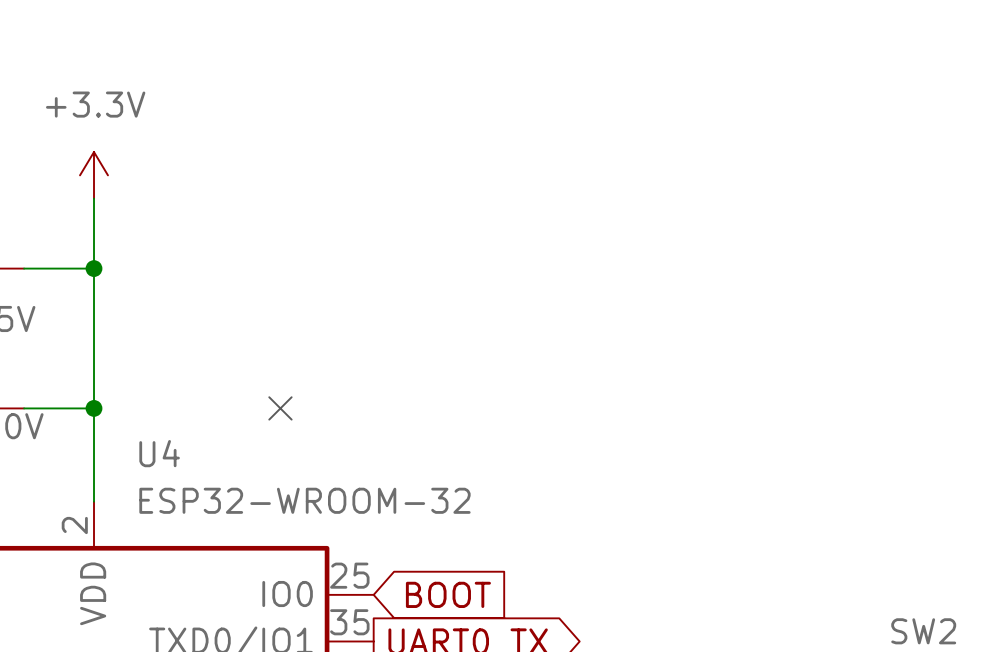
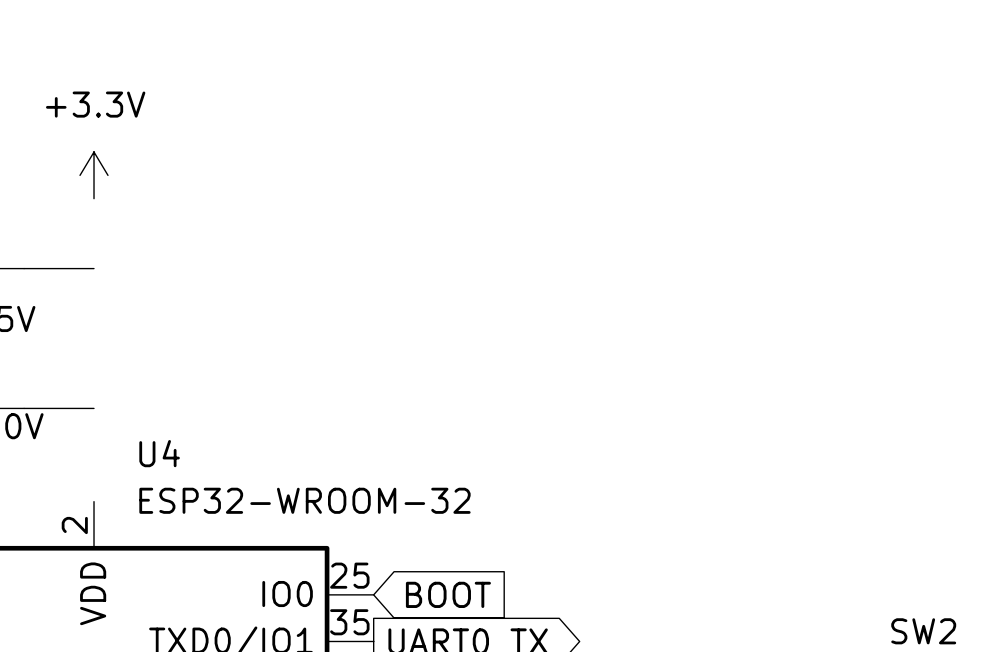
wire: (94, 198) (94, 501) -> none
junction: (94, 268) -> none
junction: (94, 408) -> none
no-connect mark: (280, 408) -> none

